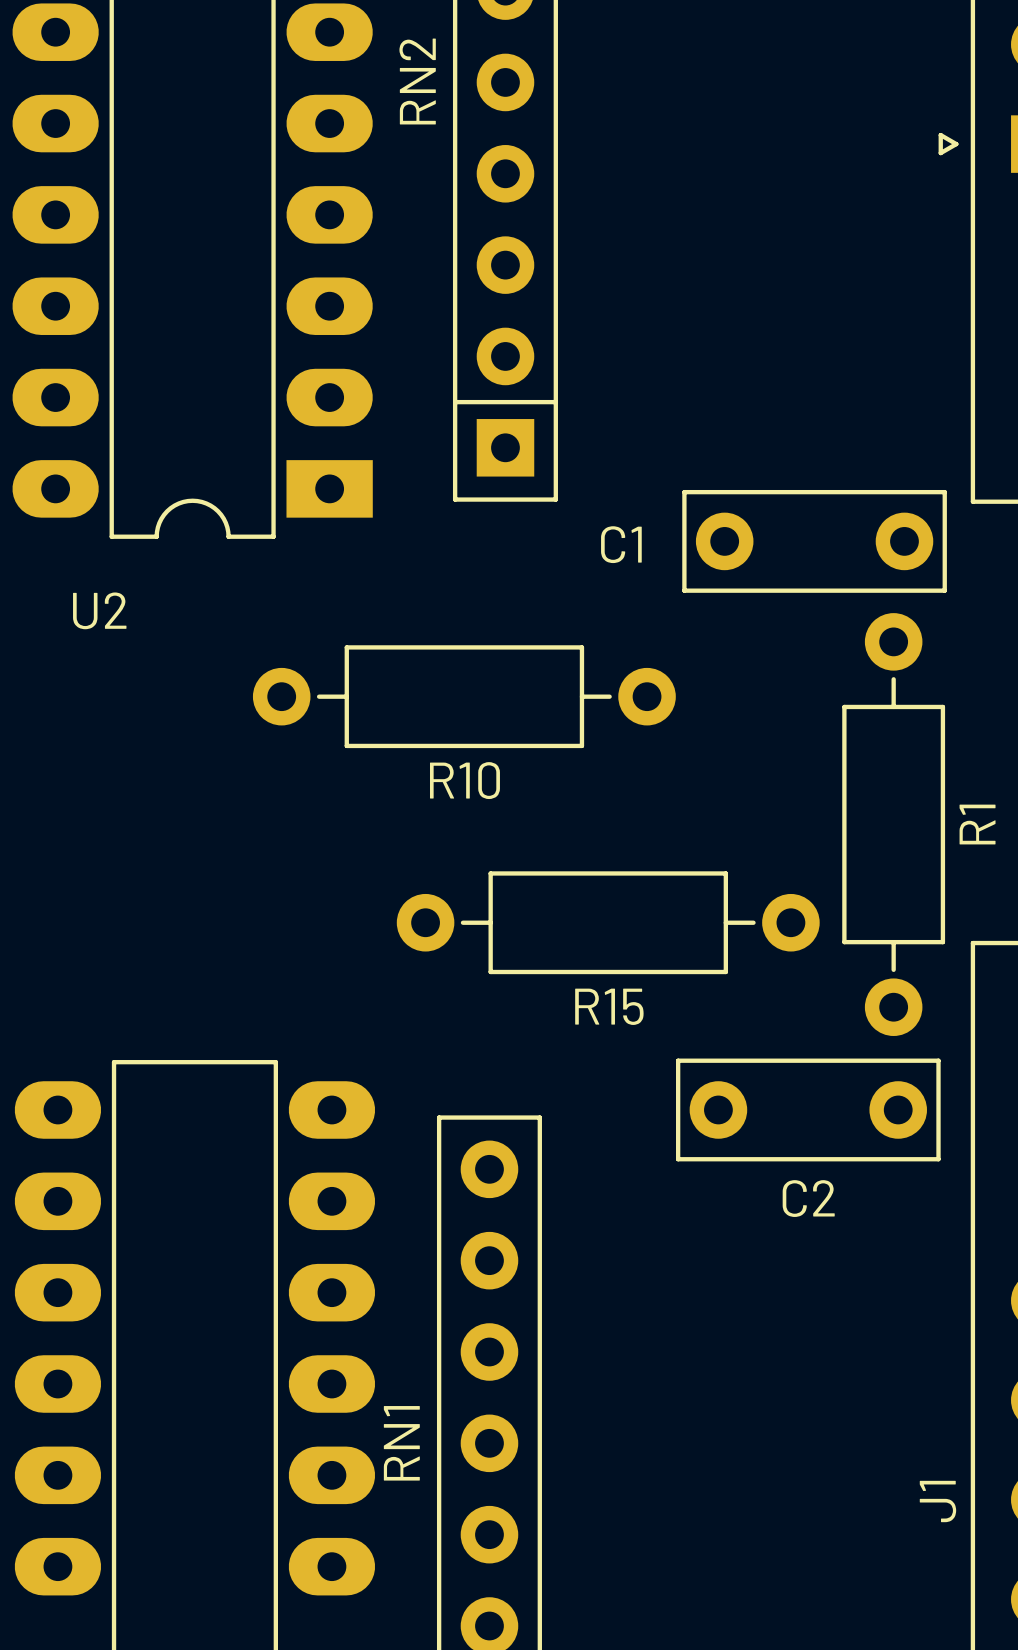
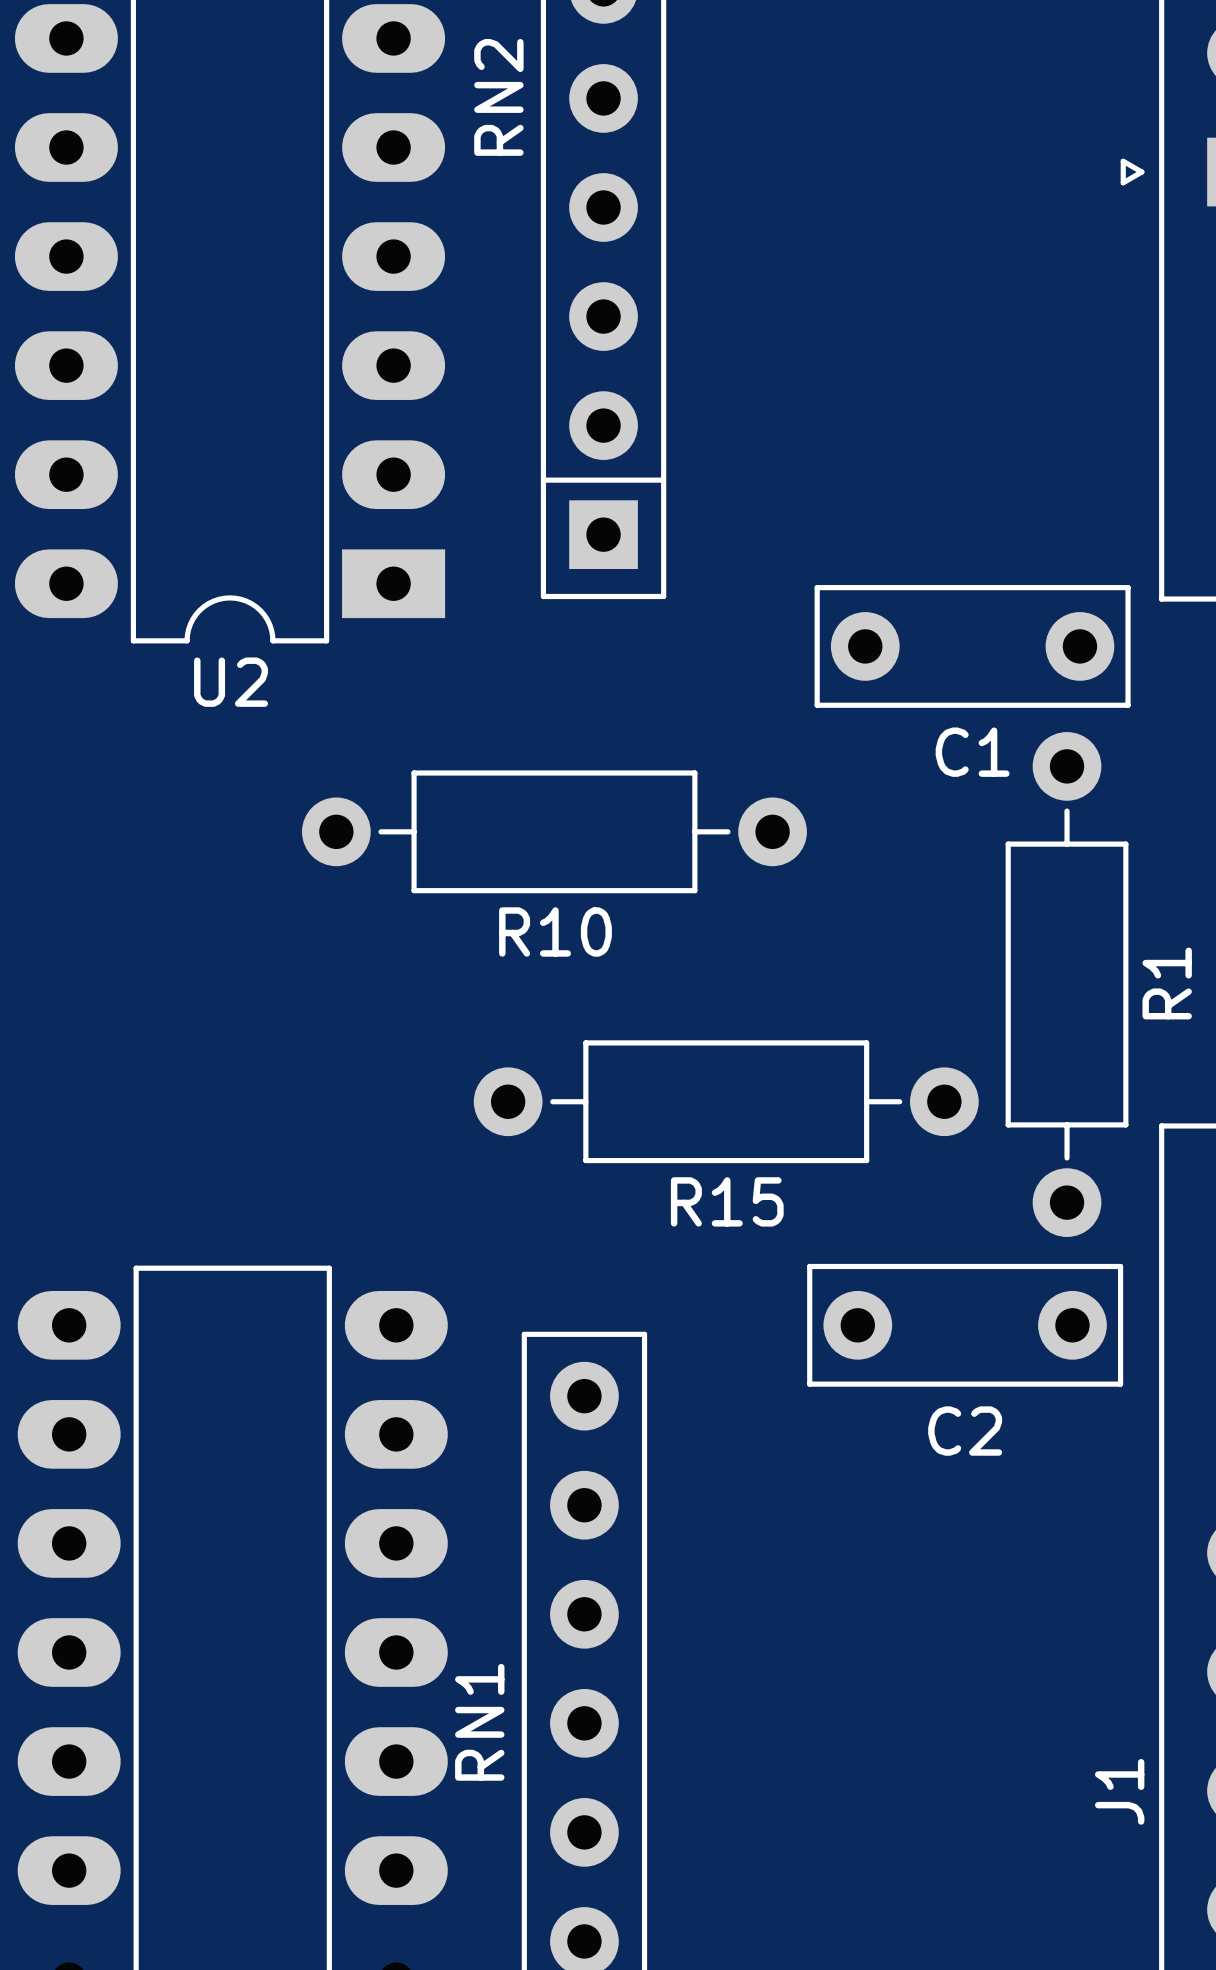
C1 name position: C1 (621, 544) -> C1 (972, 752)
U2 name position: U2 (99, 610) -> U2 (231, 682)

